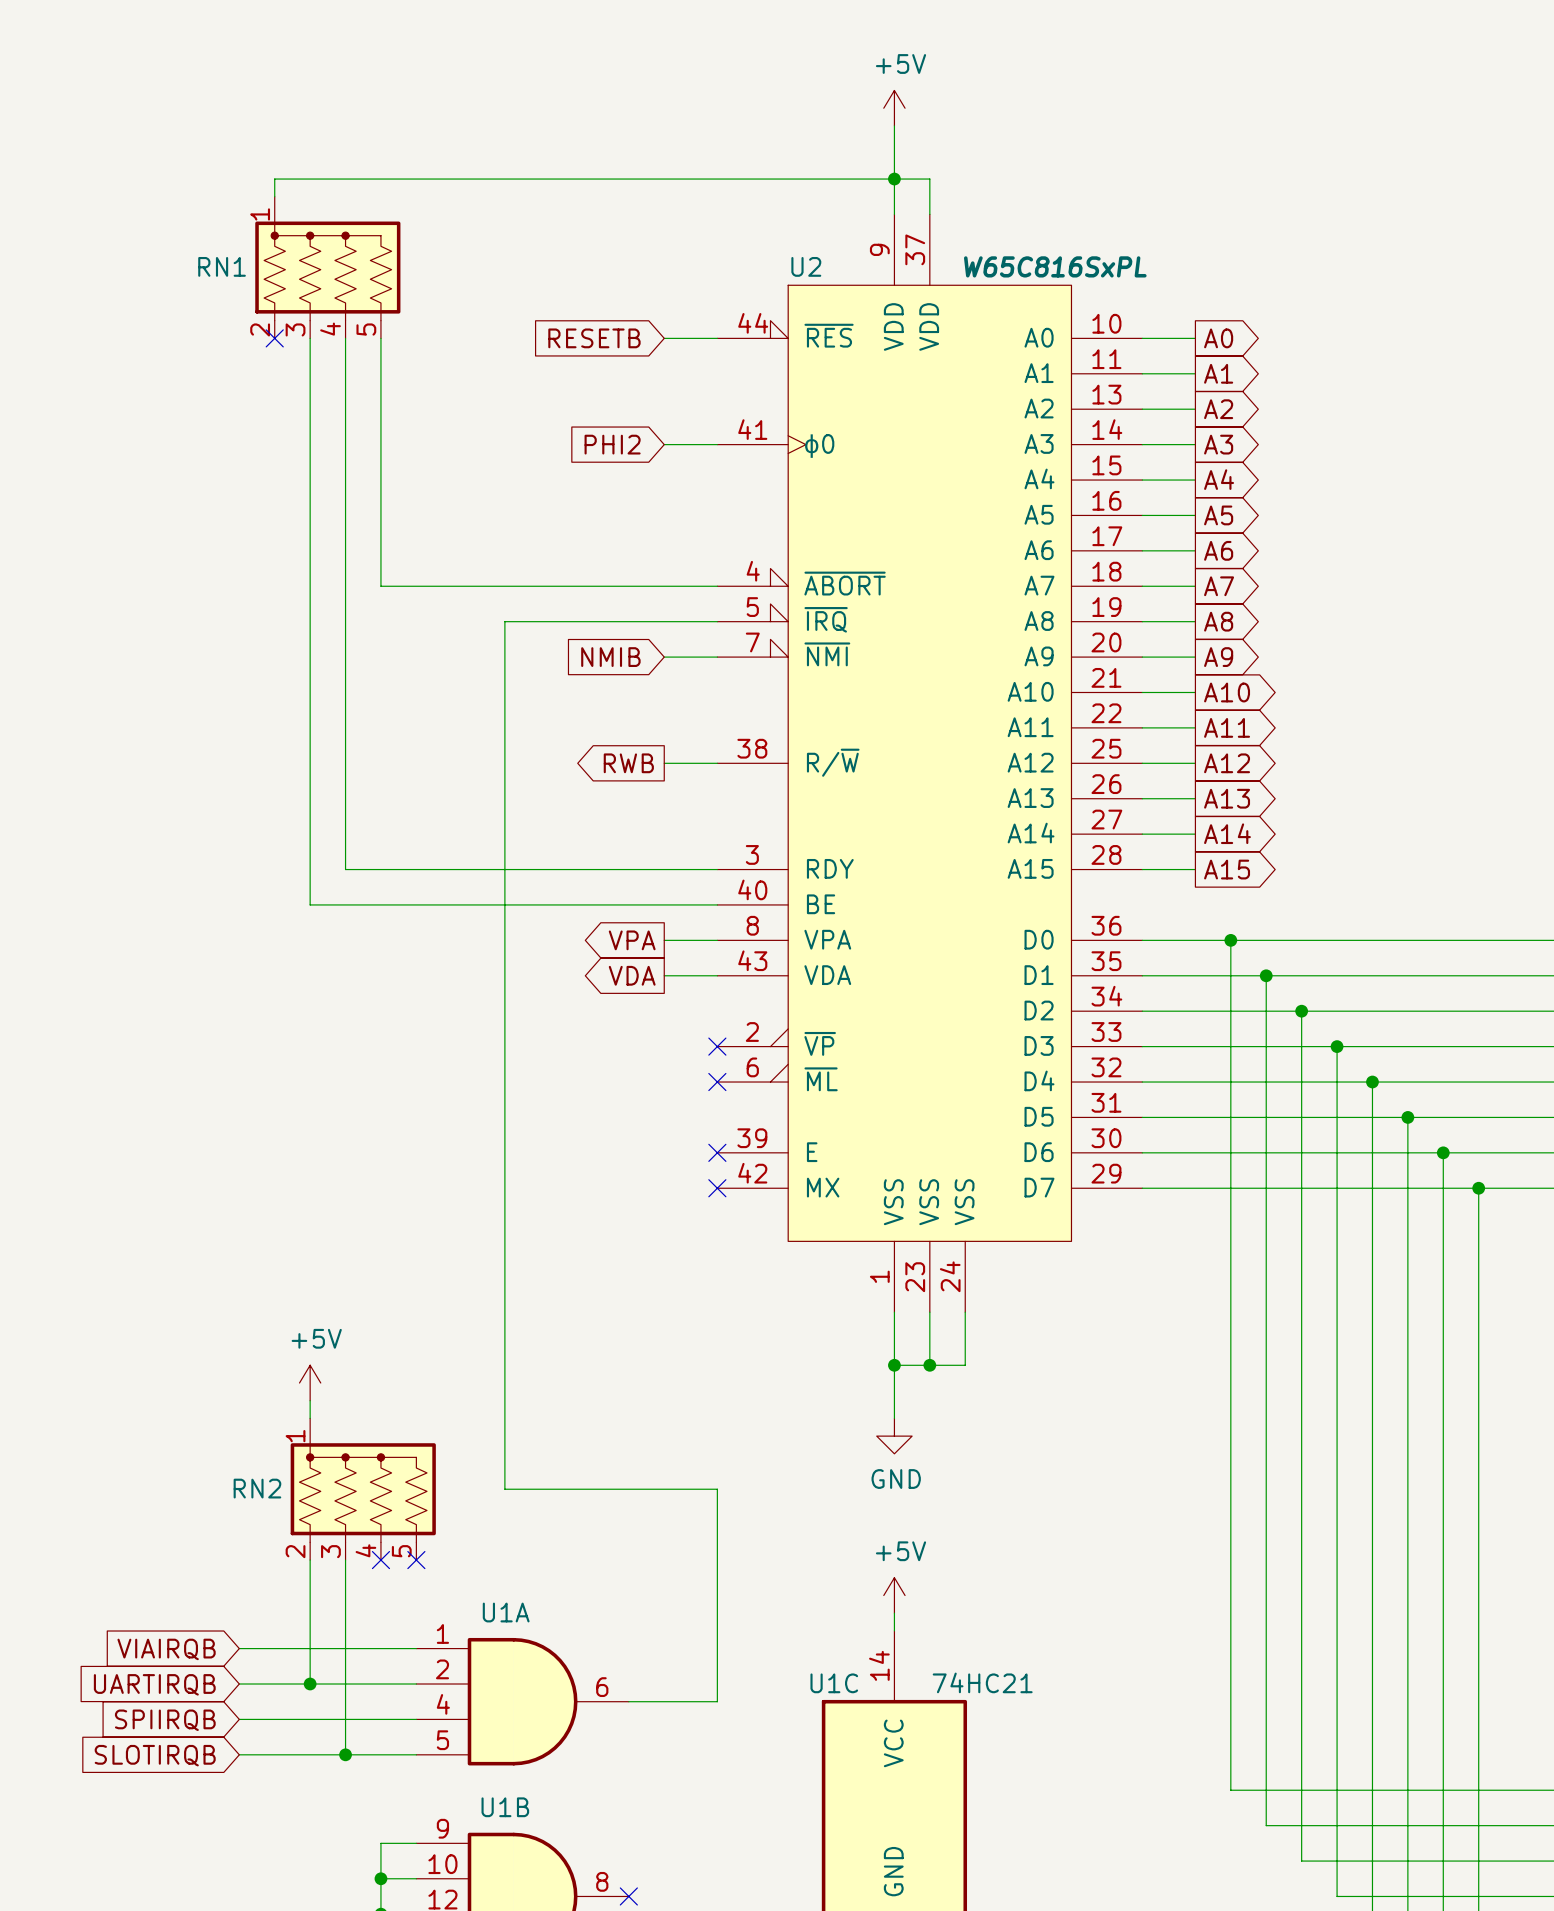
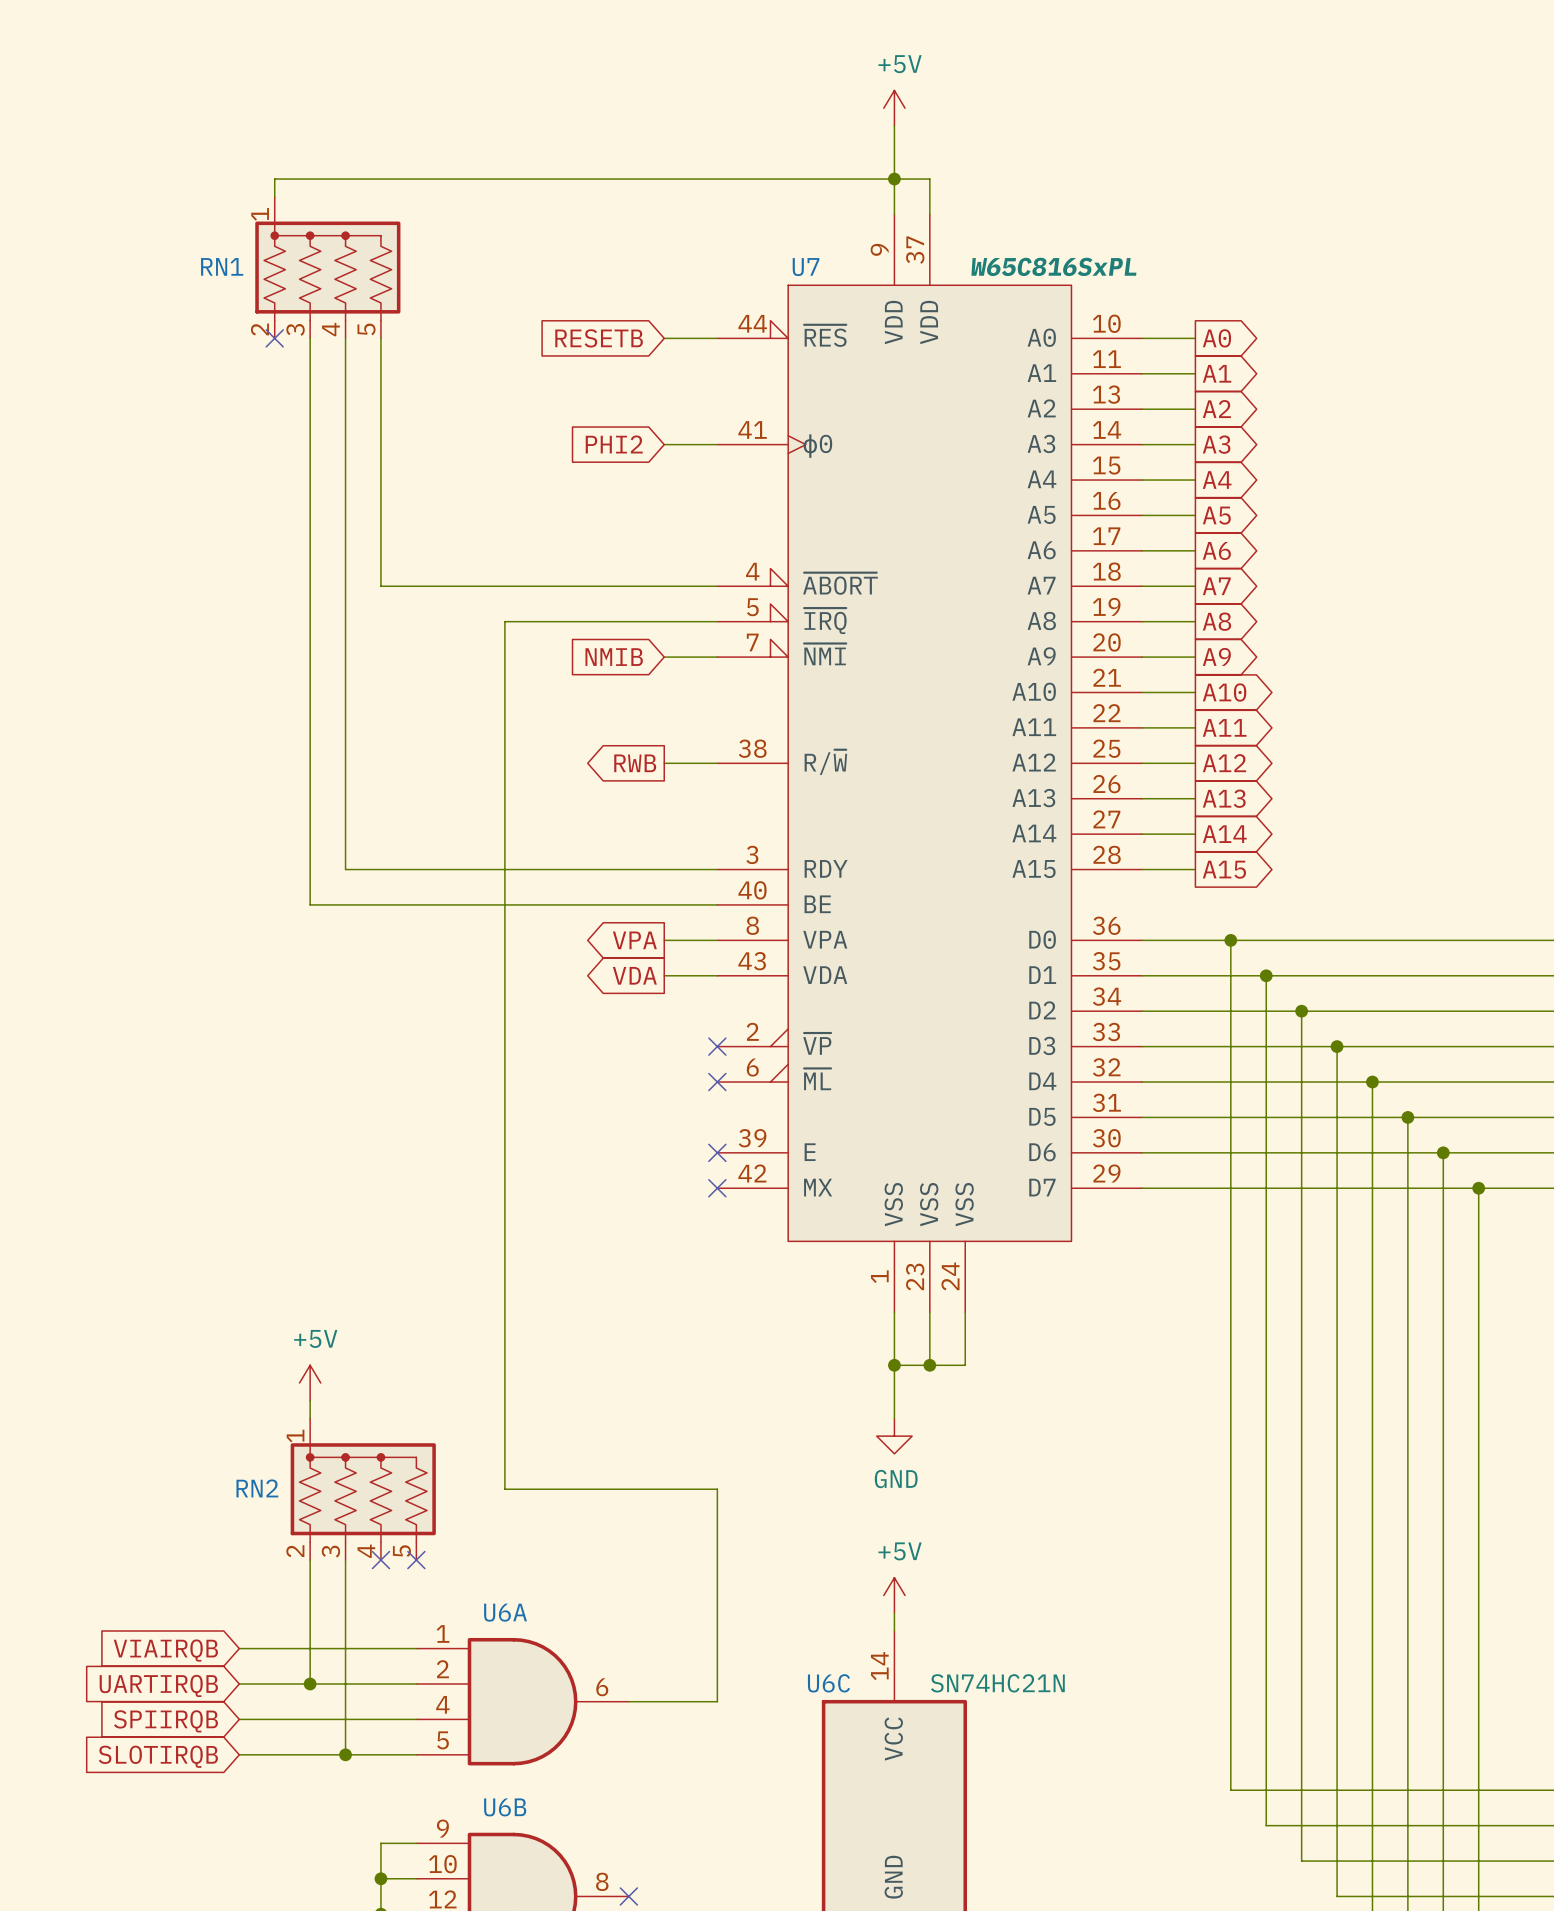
U2 name: U2 (806, 266) -> U7 (806, 267)
U1A name: U1A (506, 1612) -> U6A (505, 1612)
U1C value: 74HC21 (982, 1682) -> SN74HC21N (997, 1683)
U1C name: U1C (834, 1683) -> U6C (828, 1683)
U1B name: U1B (505, 1807) -> U6B (505, 1807)

